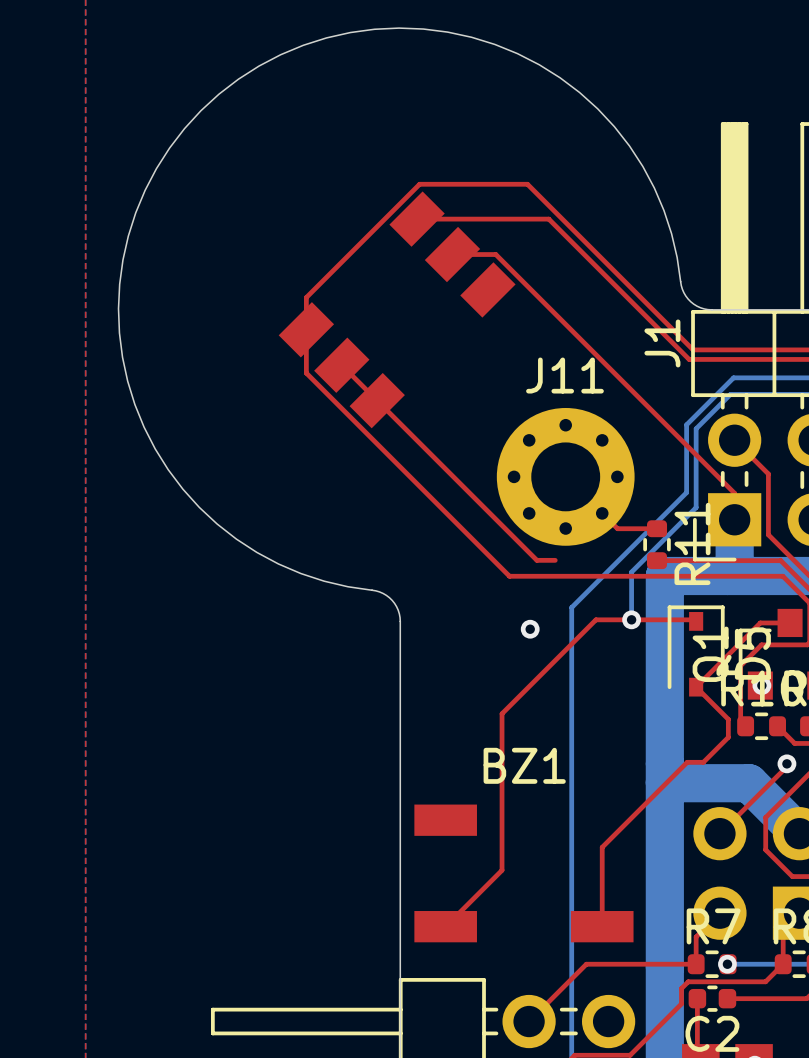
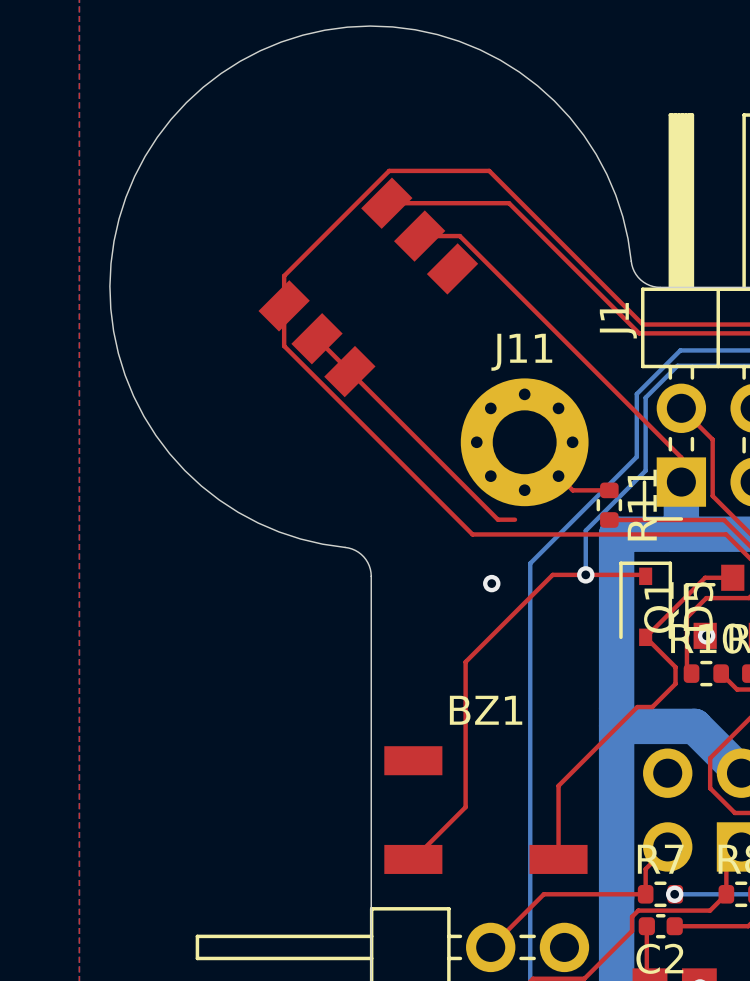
top track: (786, 763) (786, 766) (719, 833) -> none
via: (786, 763) -> none

